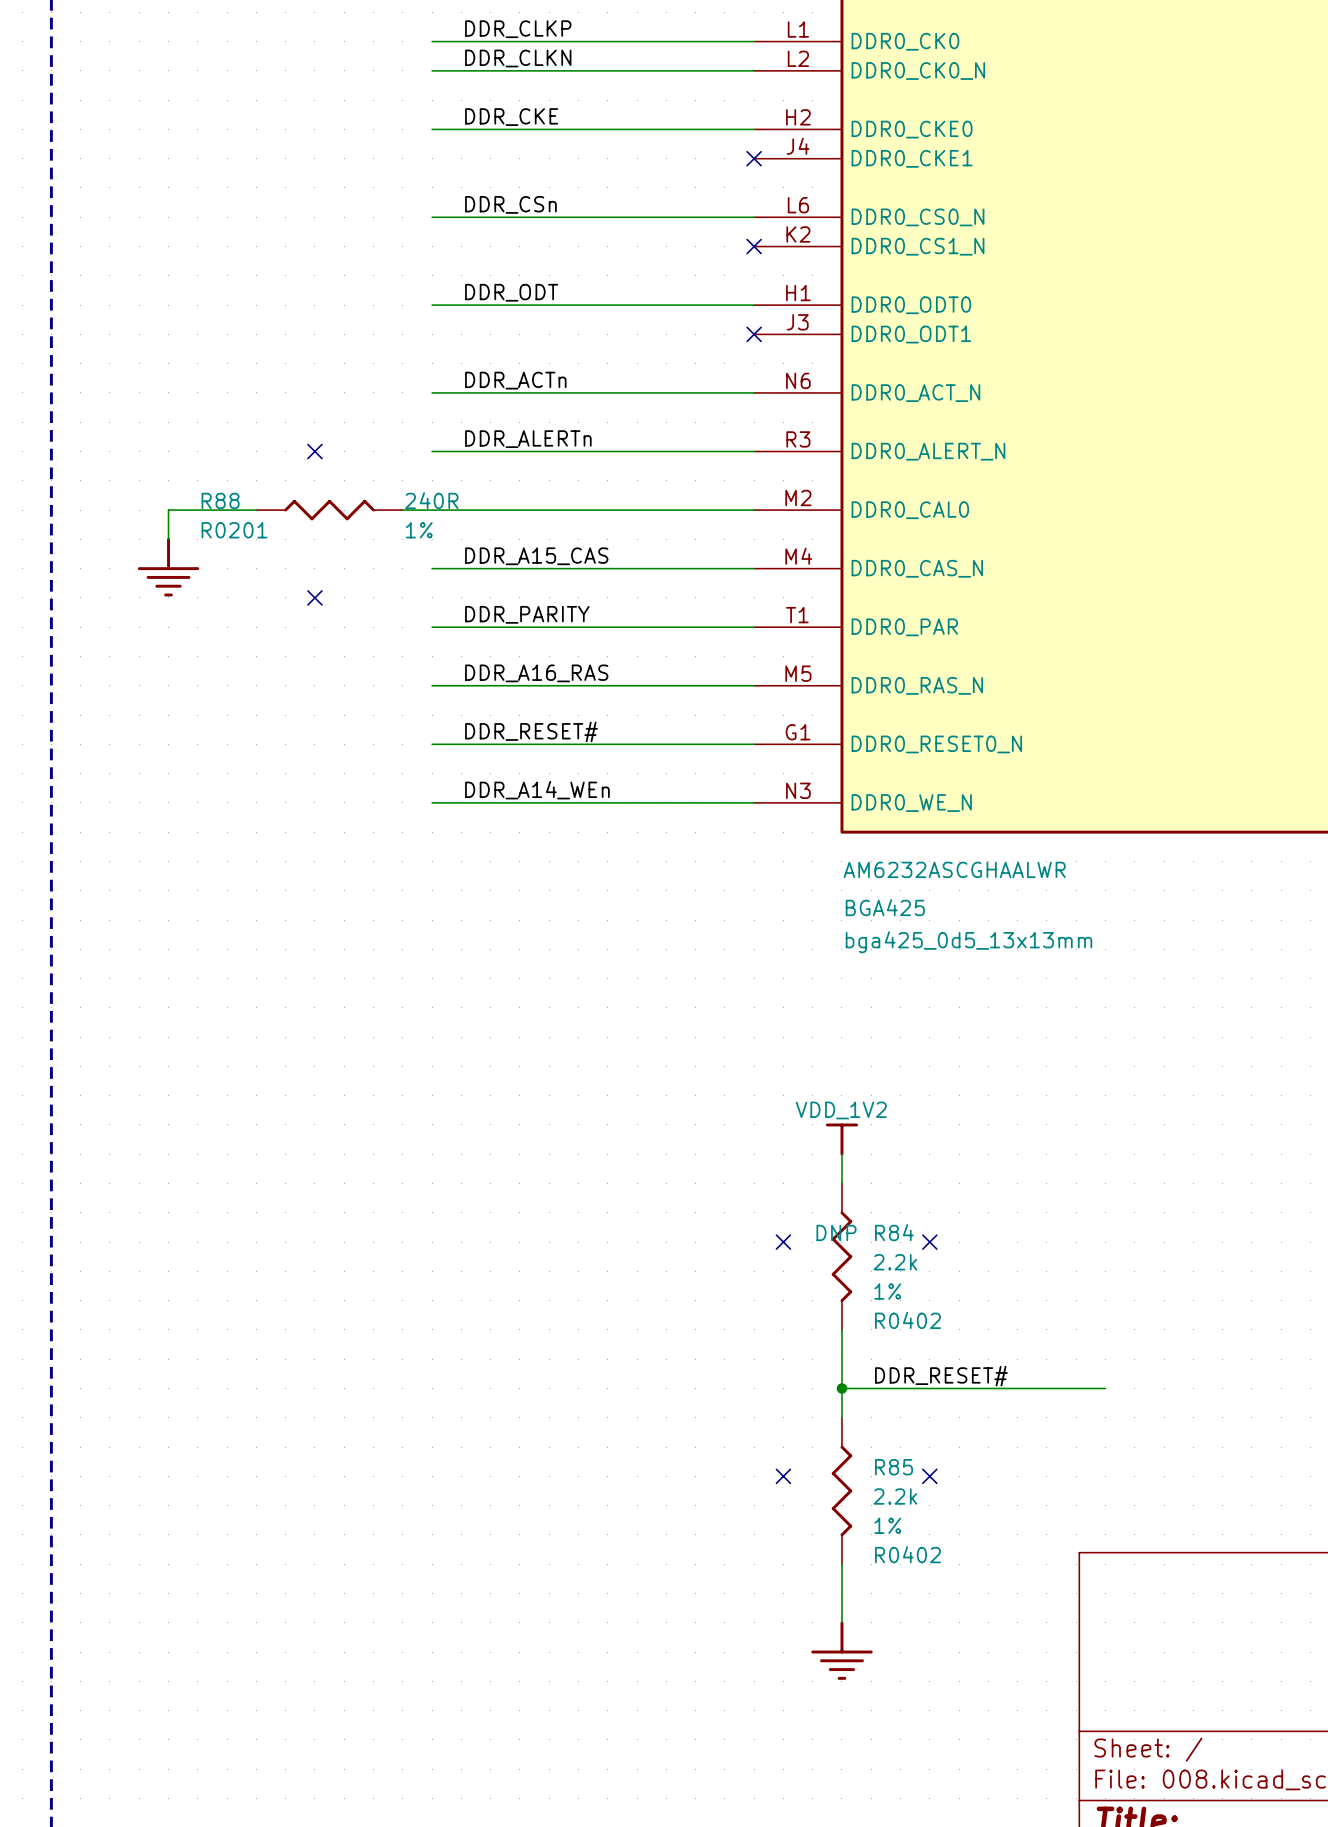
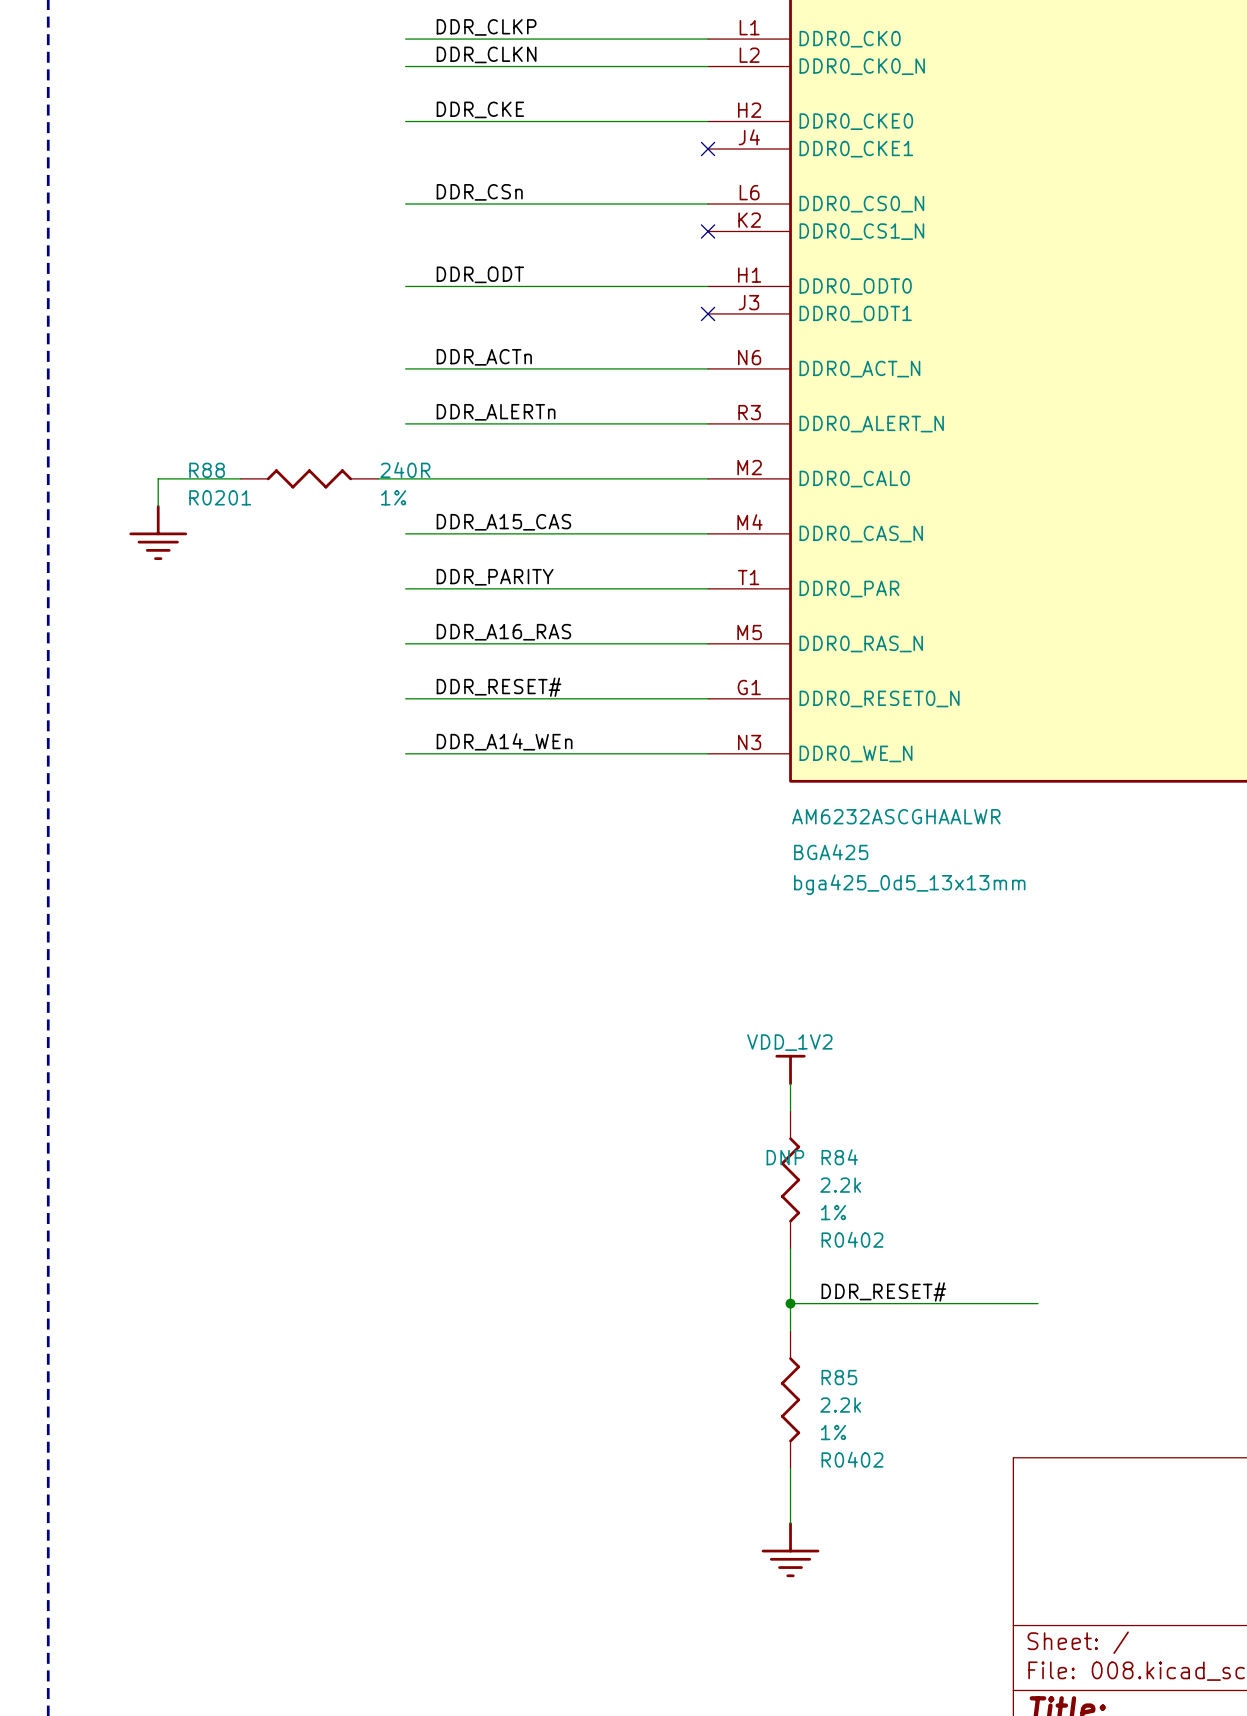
no-connect mark: (314, 451) -> none
no-connect mark: (314, 597) -> none
no-connect mark: (783, 1242) -> none
no-connect mark: (929, 1242) -> none
no-connect mark: (783, 1476) -> none
no-connect mark: (929, 1476) -> none

